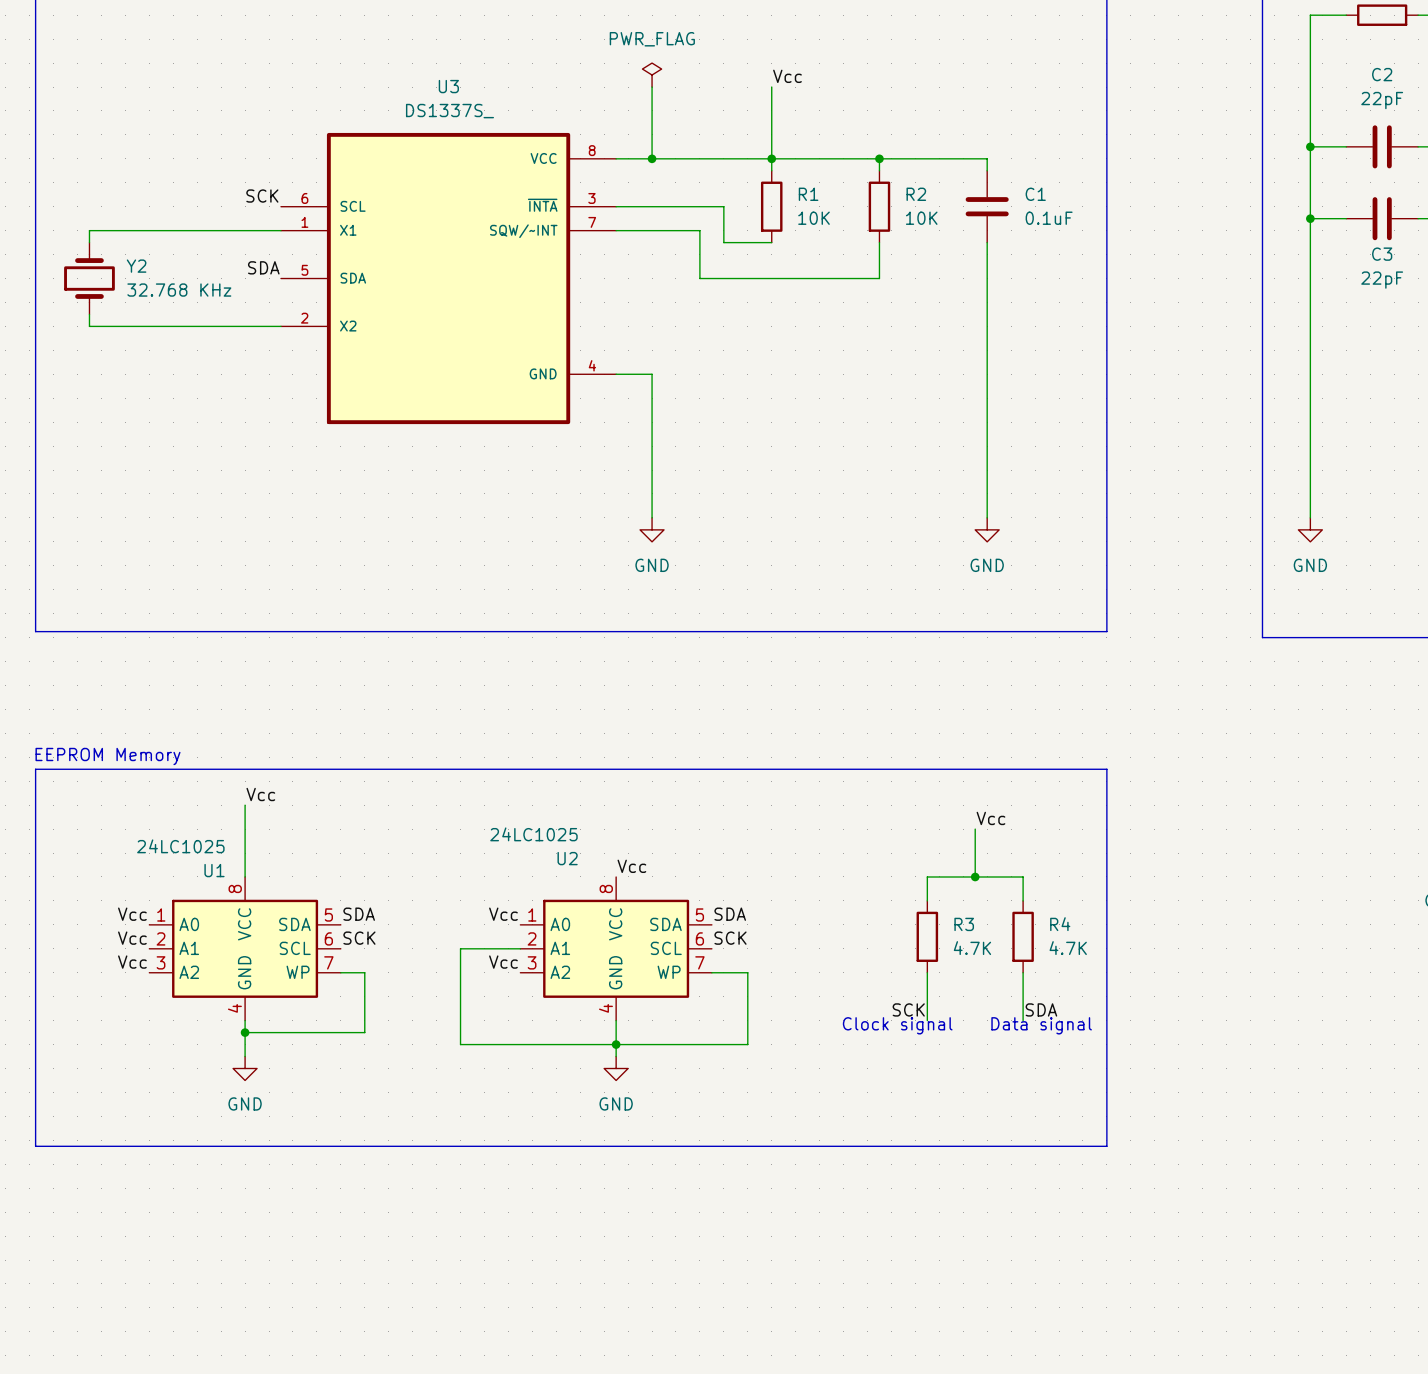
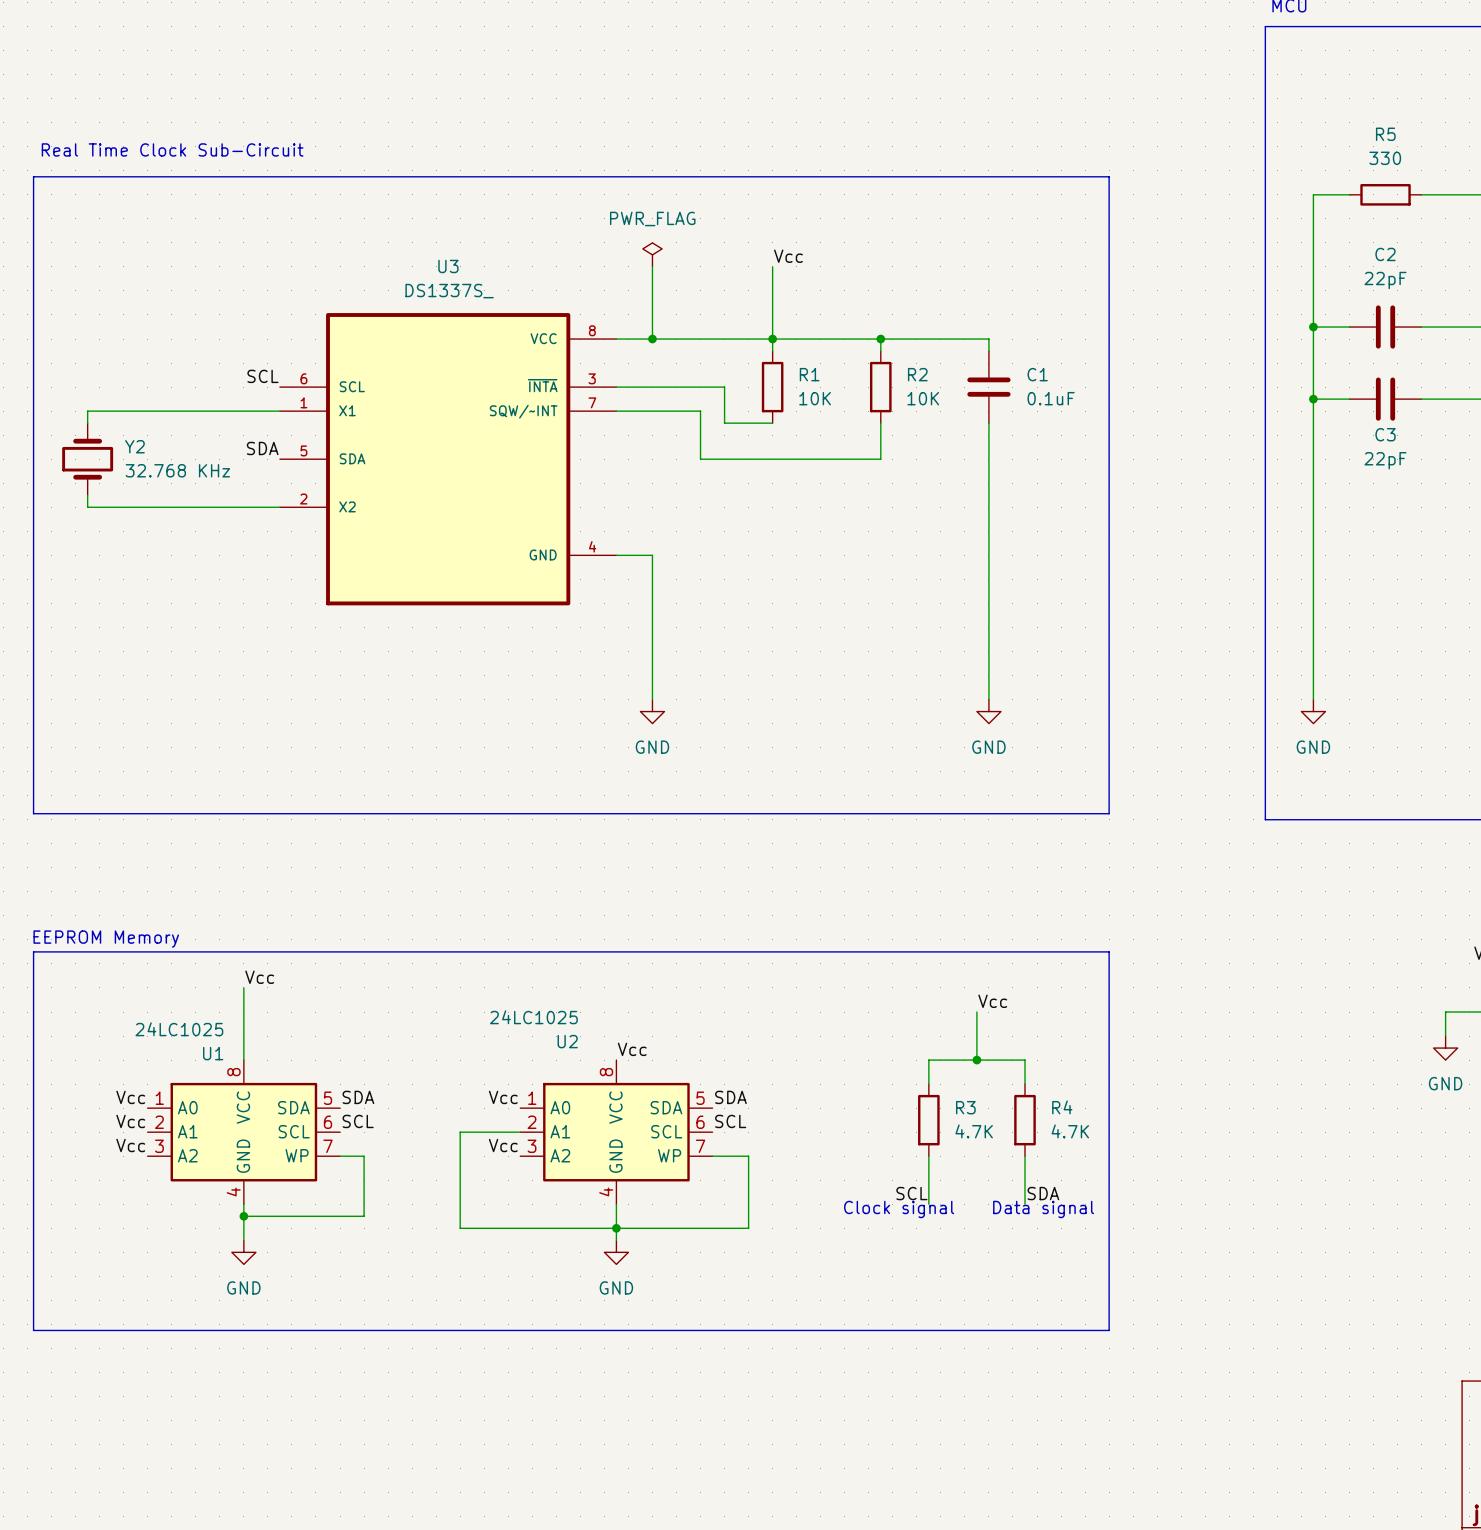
label: SCK (262, 196) -> SCL (262, 376)
label: SCK (359, 938) -> SCL (358, 1121)
label: SCK (730, 938) -> SCL (730, 1121)
label: SCK (908, 1009) -> SCL (911, 1193)

